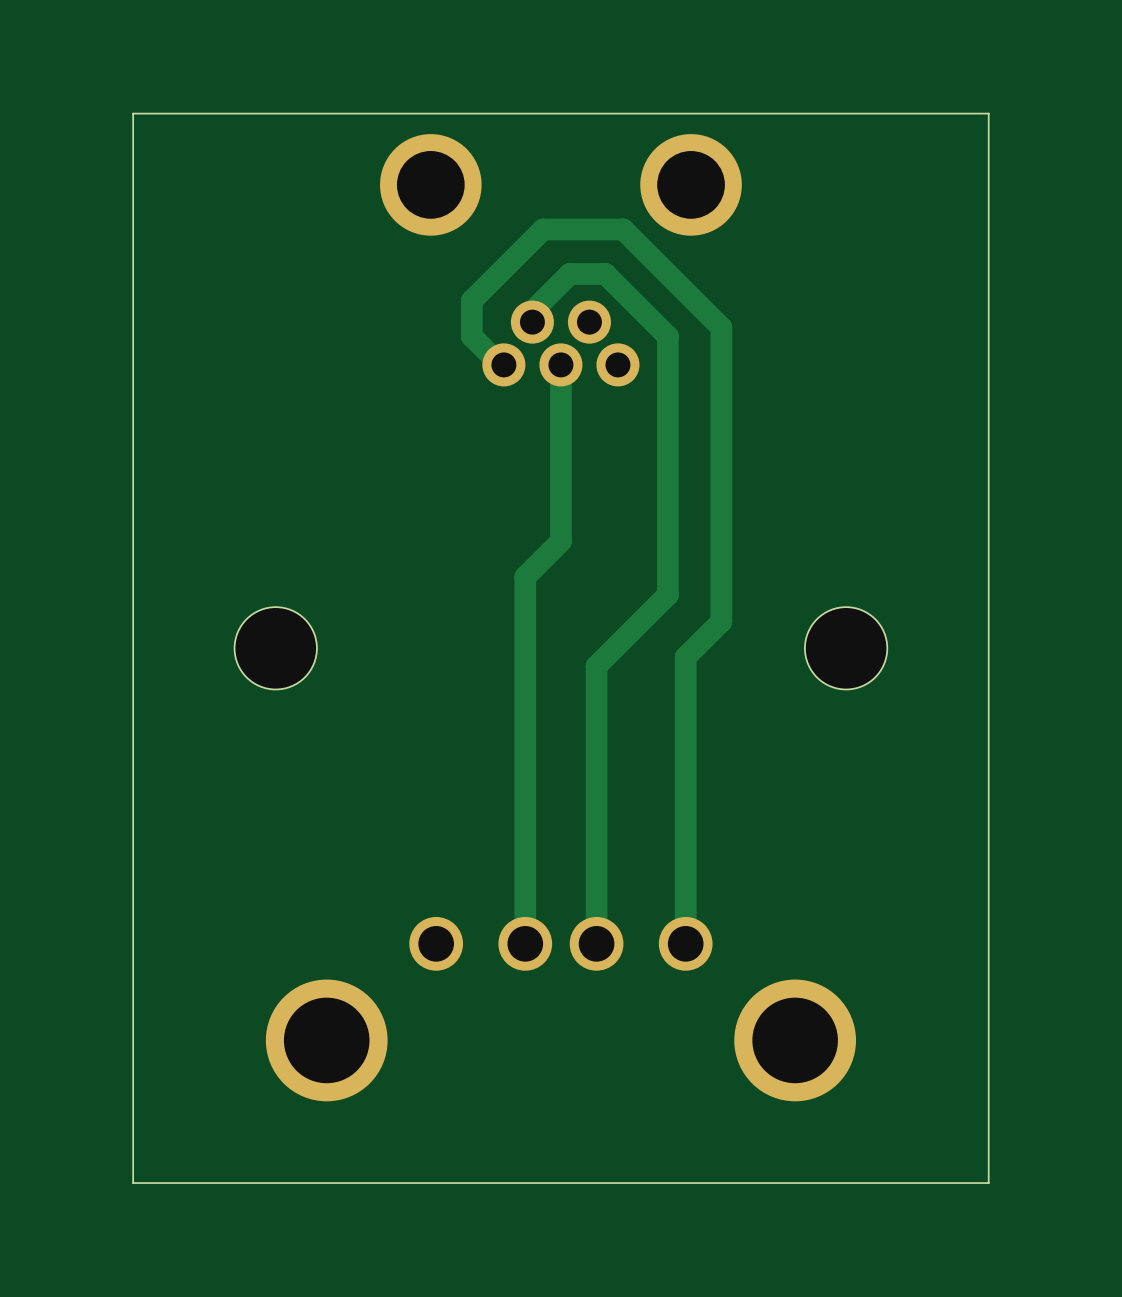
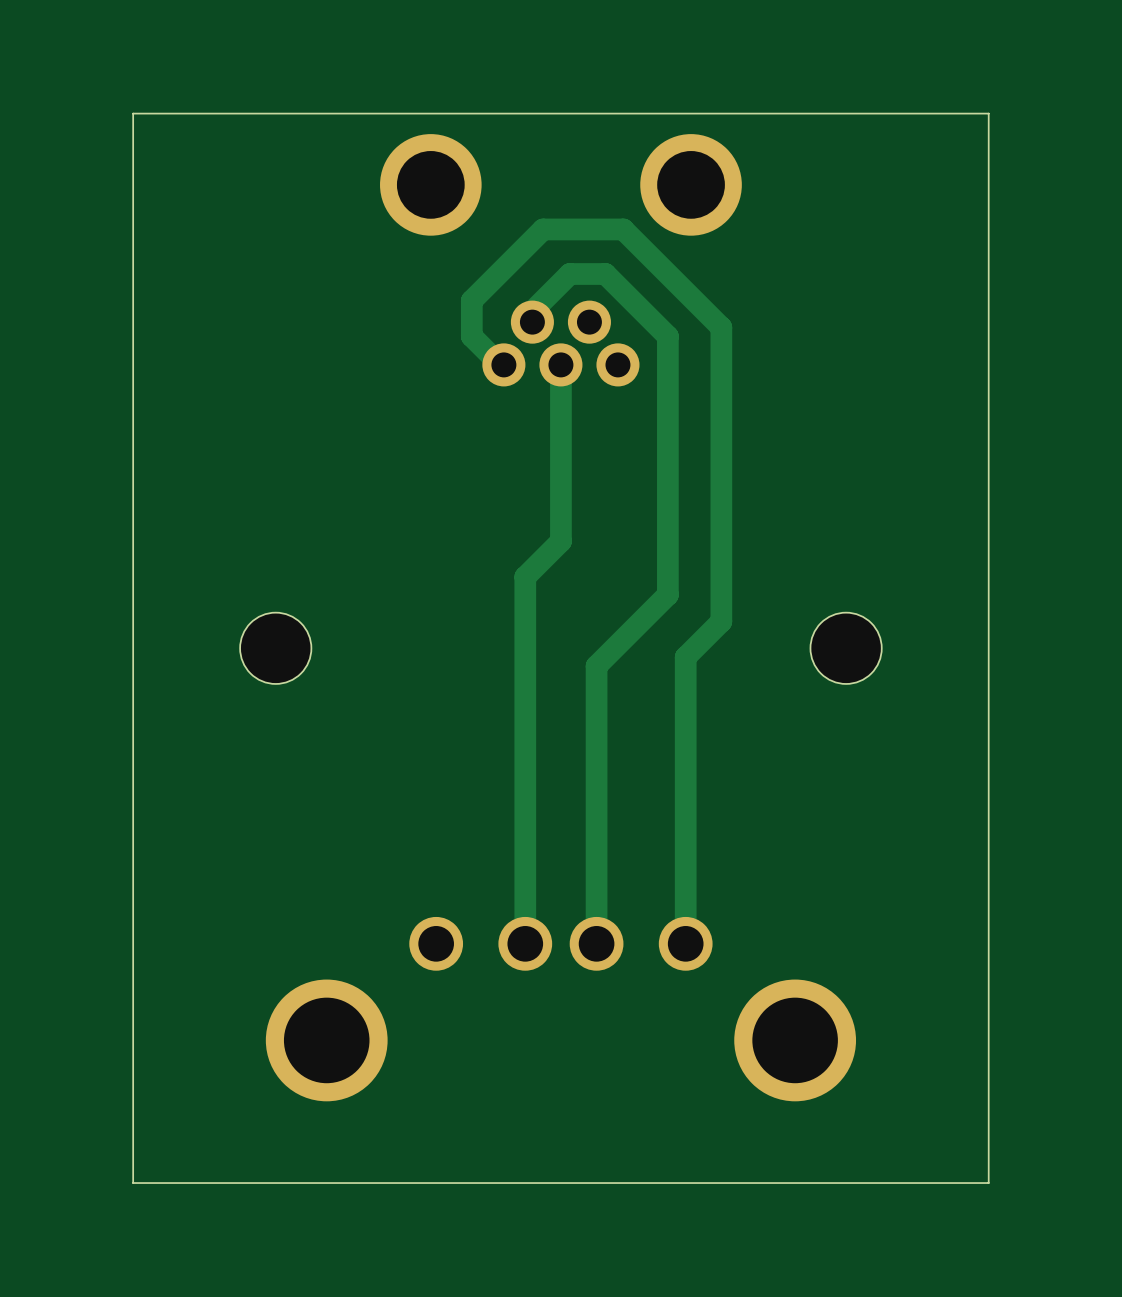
part footprint: [234, 607, 317, 690] -> [240, 612, 312, 684]
part footprint: [804, 607, 888, 690] -> [810, 612, 882, 684]

